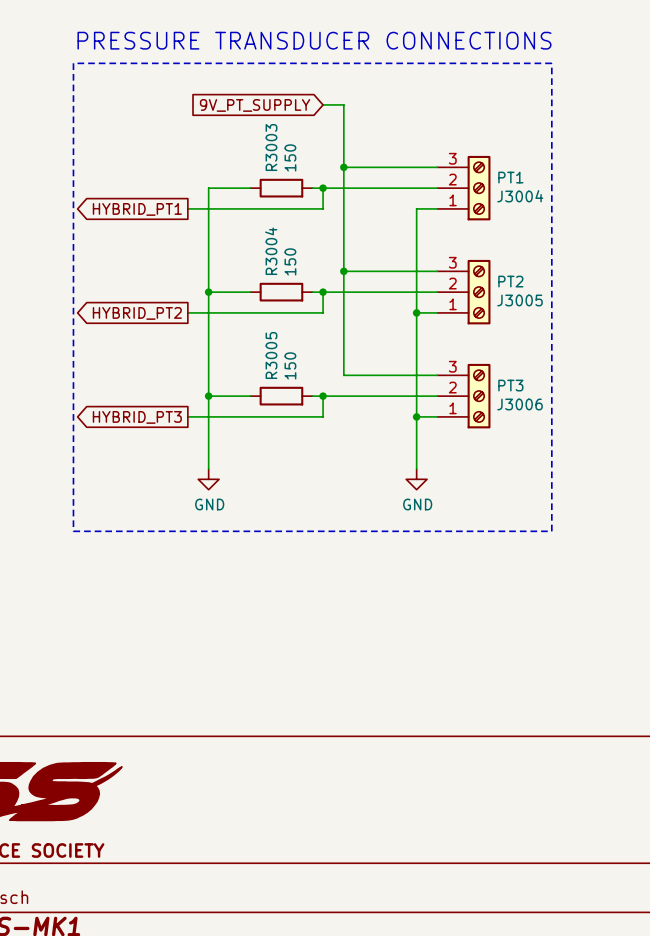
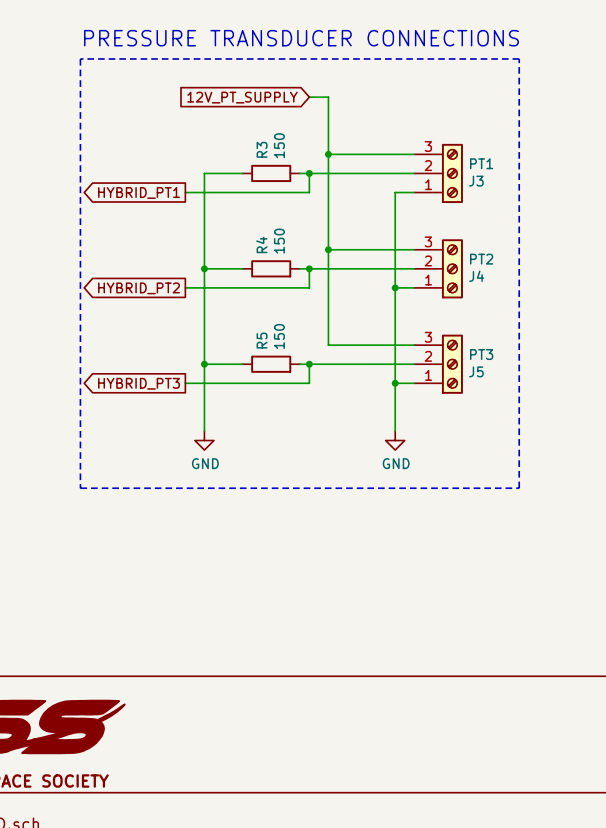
global label: 9V_PT_SUPPLY (255, 105) -> 12V_PT_SUPPLY (242, 97)
R3003 name: R3003 (271, 147) -> R3 (262, 149)
J3004 name: J3004 (520, 196) -> J3 (476, 181)
R3004 name: R3004 (271, 251) -> R4 (261, 244)
J3005 name: J3005 (520, 300) -> J4 (476, 276)
R3005 name: R3005 (271, 355) -> R5 (262, 340)
J3006 name: J3006 (520, 404) -> J5 (476, 371)

